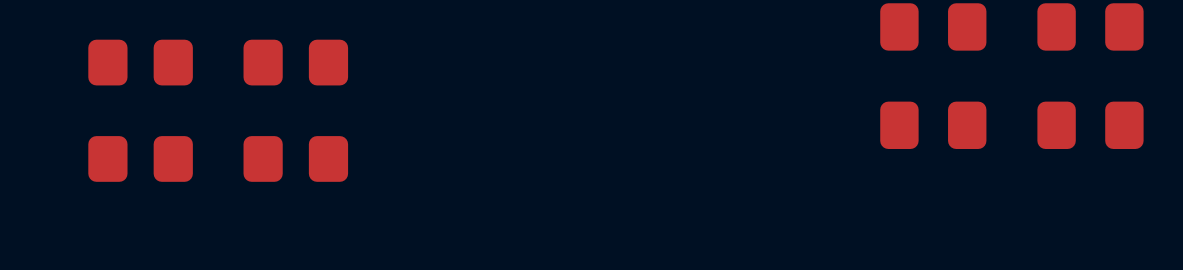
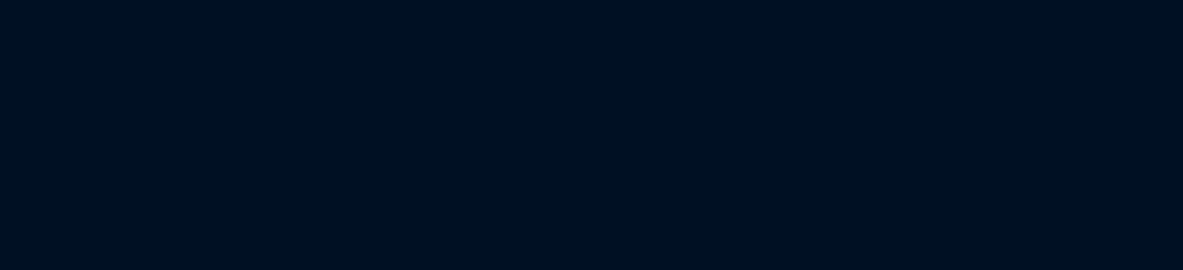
part: (933, 26) -> none
part: (1090, 26) -> none
part: (140, 62) -> none
part: (295, 62) -> none
part: (933, 125) -> none
part: (1090, 125) -> none
part: (140, 158) -> none
part: (295, 158) -> none

